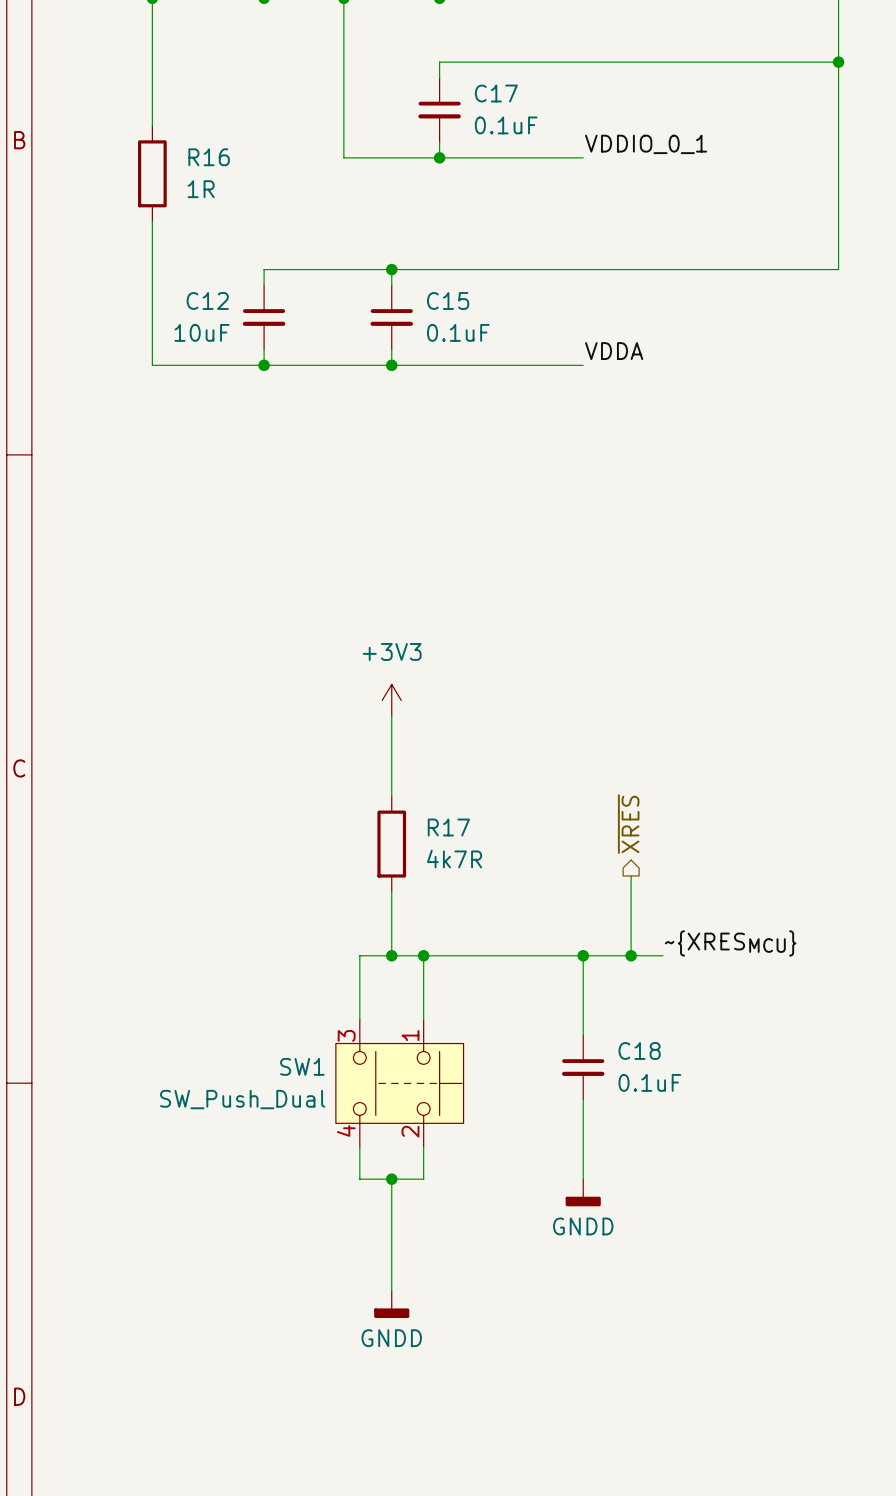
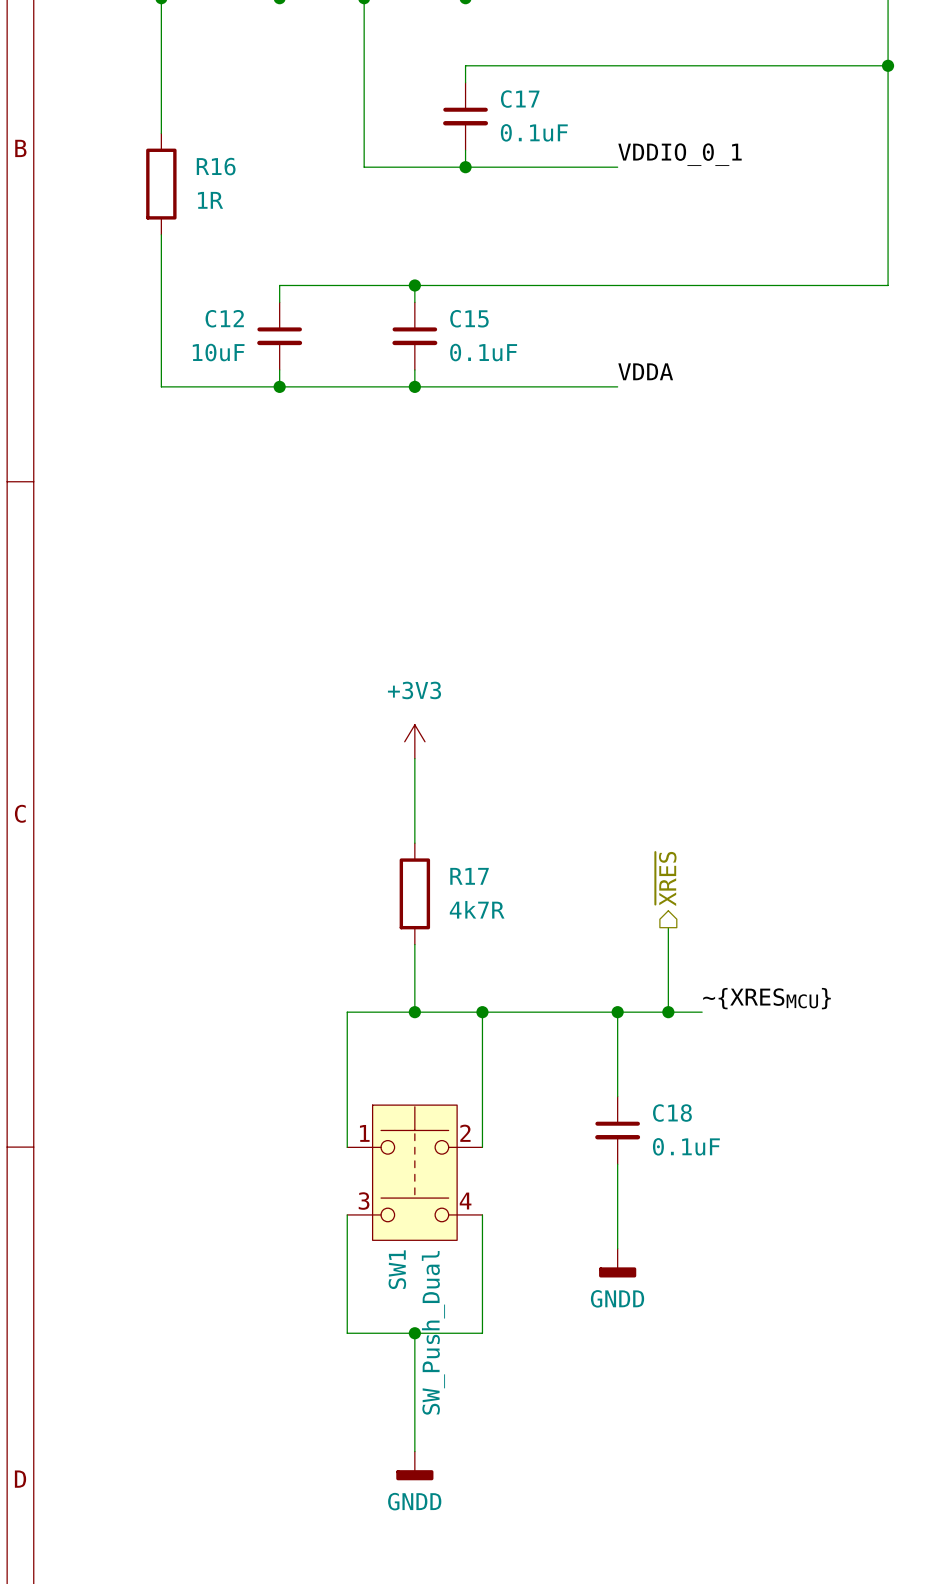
wire: (359, 955) (359, 1019) -> (381, 1012) (347, 1012) (347, 1147)
wire: (423, 955) (423, 1019) -> none
junction position: (423, 955) -> (482, 1012)
wire: none -> (482, 1012) (482, 1147)
SW1 rotation: 0° (399, 1083) -> 90° counterclockwise (414, 1172)
wire: none -> (347, 1214) (347, 1333) (482, 1333) (482, 1214)
wire: (359, 1147) (359, 1179) (423, 1179) (423, 1147) -> none
wire: (391, 1179) (391, 1258) -> (414, 1367) (414, 1451)
junction: (391, 1179) -> none
junction: none -> (414, 1333)
power symbol position: GNDD (391, 1304) -> GNDD (414, 1465)

